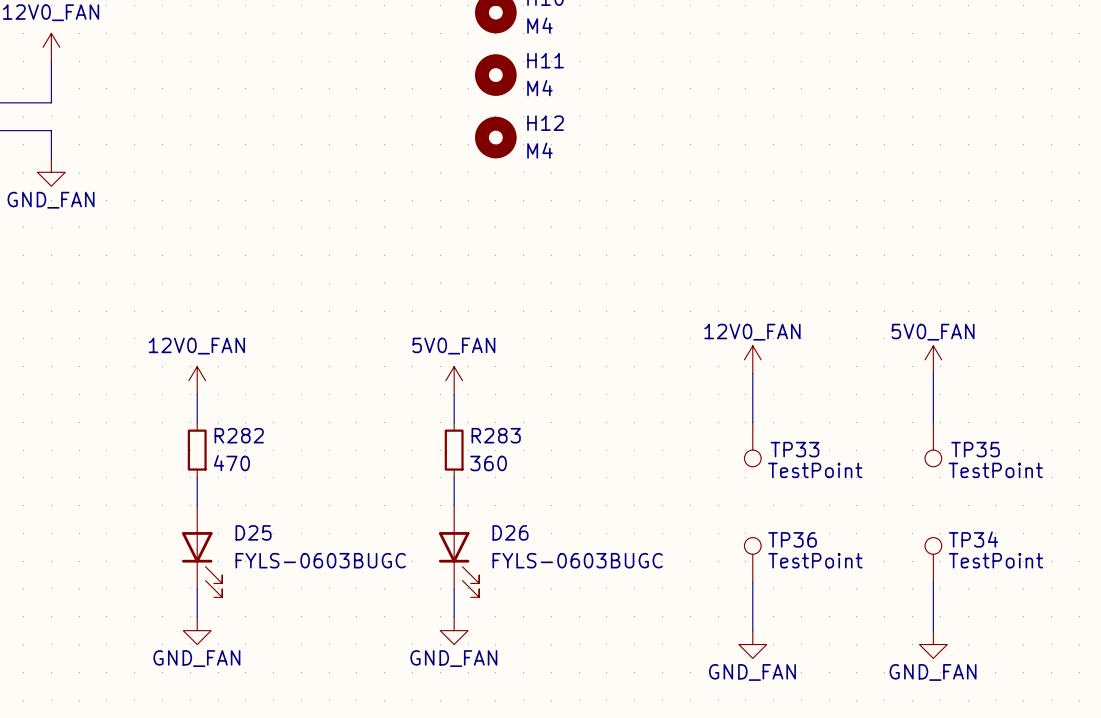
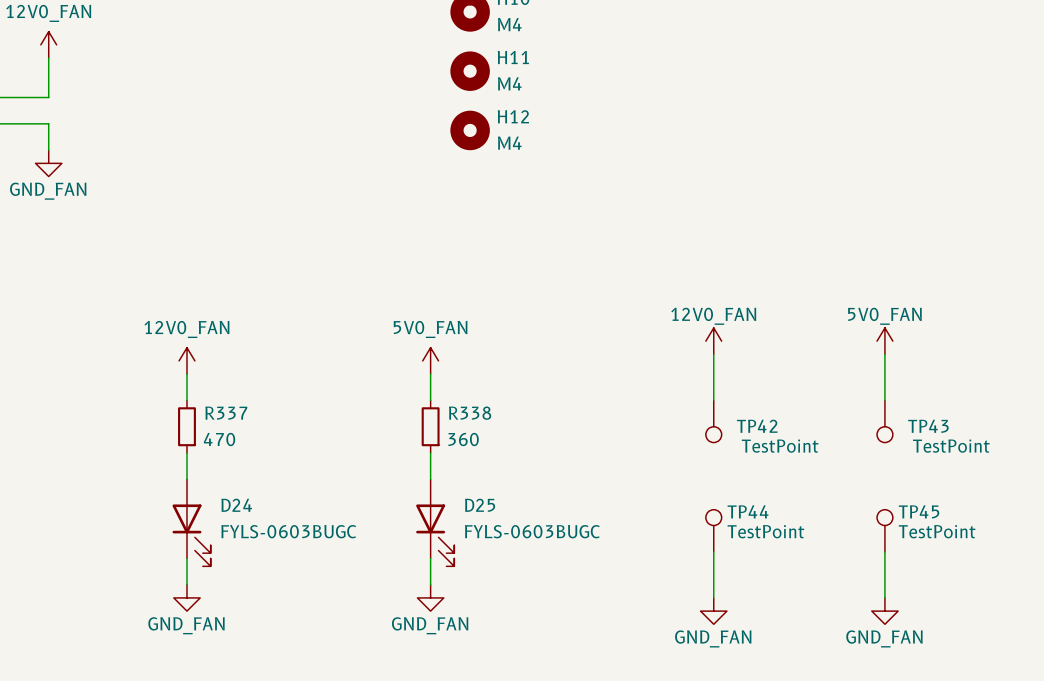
R282 name: R282 (239, 435) -> R337 (226, 413)
R283 name: R283 (496, 435) -> R338 (470, 413)
TP33 name: TP33 (795, 449) -> TP42 (757, 426)
TP35 name: TP35 (975, 449) -> TP43 (928, 426)
D25 name: D25 (253, 532) -> D24 (236, 505)
D26 name: D26 (510, 532) -> D25 (480, 505)
TP36 name: TP36 (792, 539) -> TP44 (748, 511)
TP34 name: TP34 (973, 539) -> TP45 (919, 511)

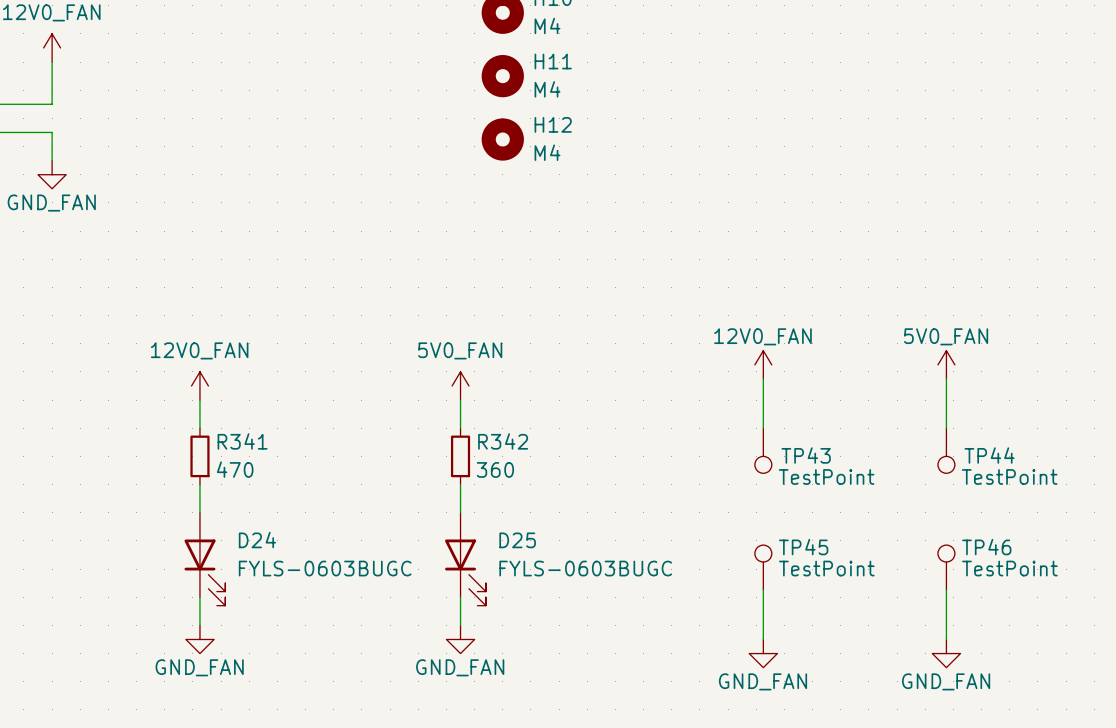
R337 name: R337 (226, 413) -> R341 (242, 441)
R338 name: R338 (470, 413) -> R342 (503, 441)
TP42 name: TP42 (757, 426) -> TP43 (806, 455)
TP43 name: TP43 (928, 426) -> TP44 (989, 455)
TP44 name: TP44 (748, 511) -> TP45 (803, 547)
TP45 name: TP45 (919, 511) -> TP46 (986, 547)

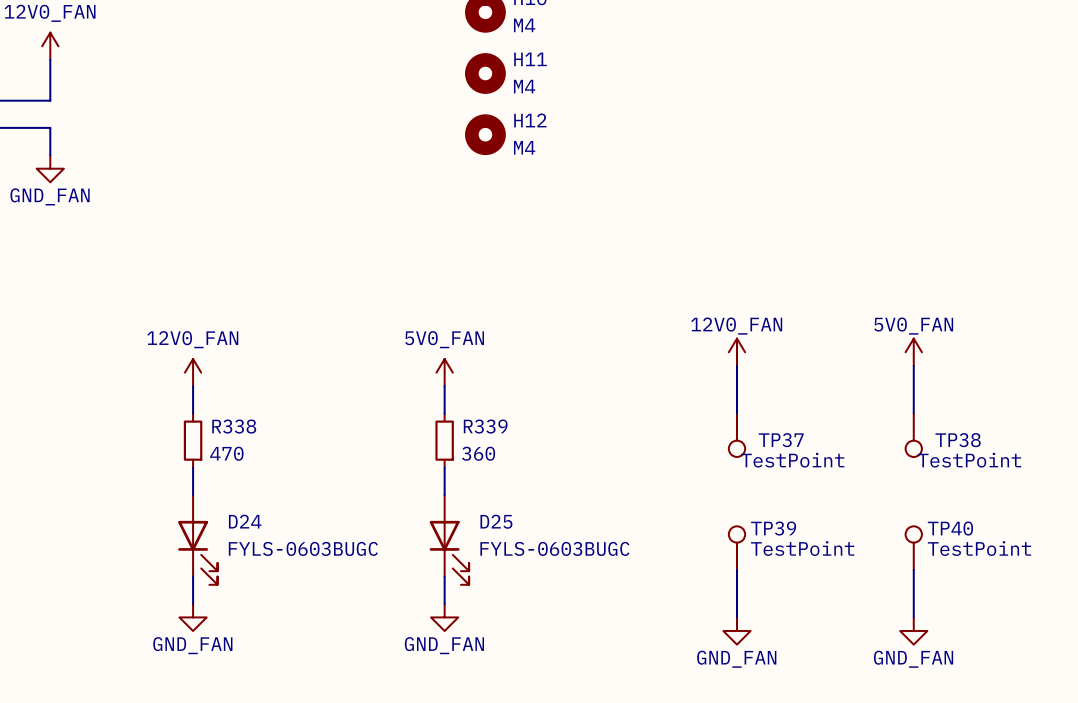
R341 name: R341 (242, 441) -> R338 (234, 426)
R342 name: R342 (503, 441) -> R339 (485, 426)
TP43 name: TP43 (806, 455) -> TP37 (781, 440)
TP44 name: TP44 (989, 455) -> TP38 (958, 440)
TP45 name: TP45 (803, 547) -> TP39 (773, 528)
TP46 name: TP46 (986, 547) -> TP40 (950, 528)

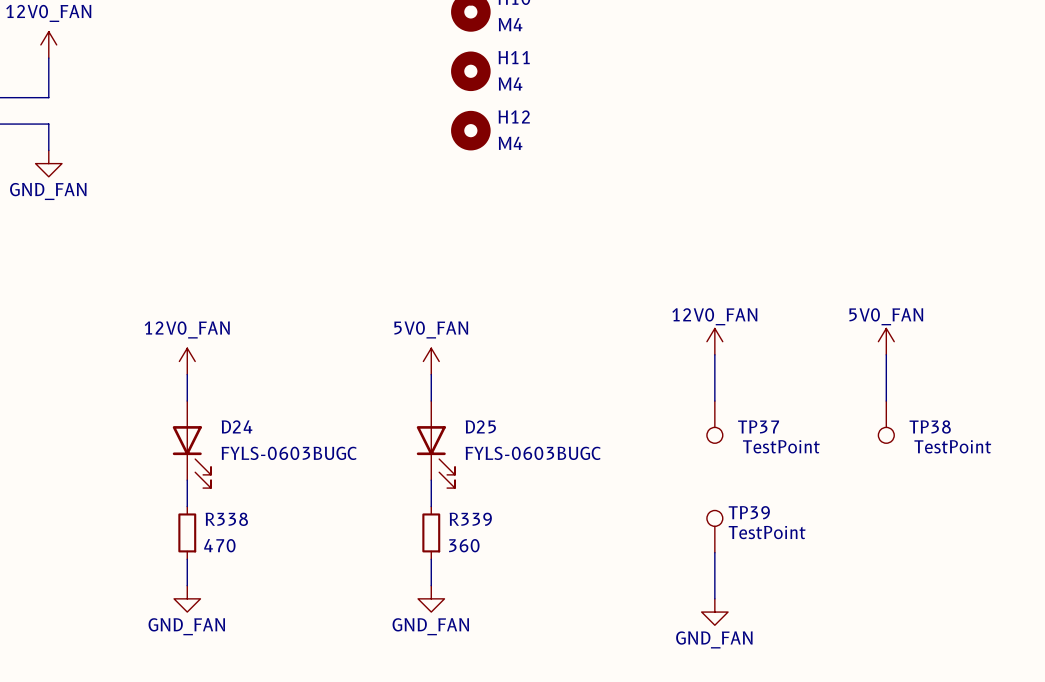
R338 position: (193, 440) -> (187, 532)
R339 position: (444, 440) -> (431, 532)
D24 position: (197, 539) -> (191, 444)
D25 position: (449, 539) -> (435, 444)
TP40: TestPoint (913, 548) -> none
wire: (913, 569) (913, 617) -> none
power symbol: GND_FAN (913, 631) -> none

